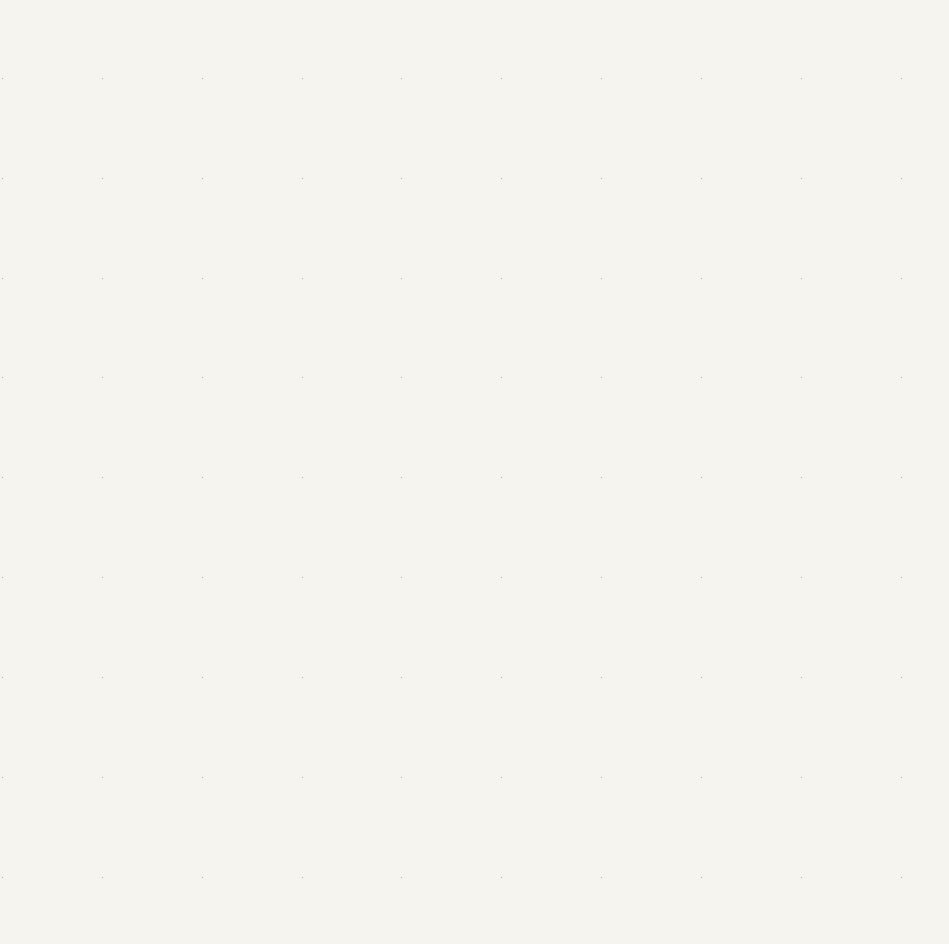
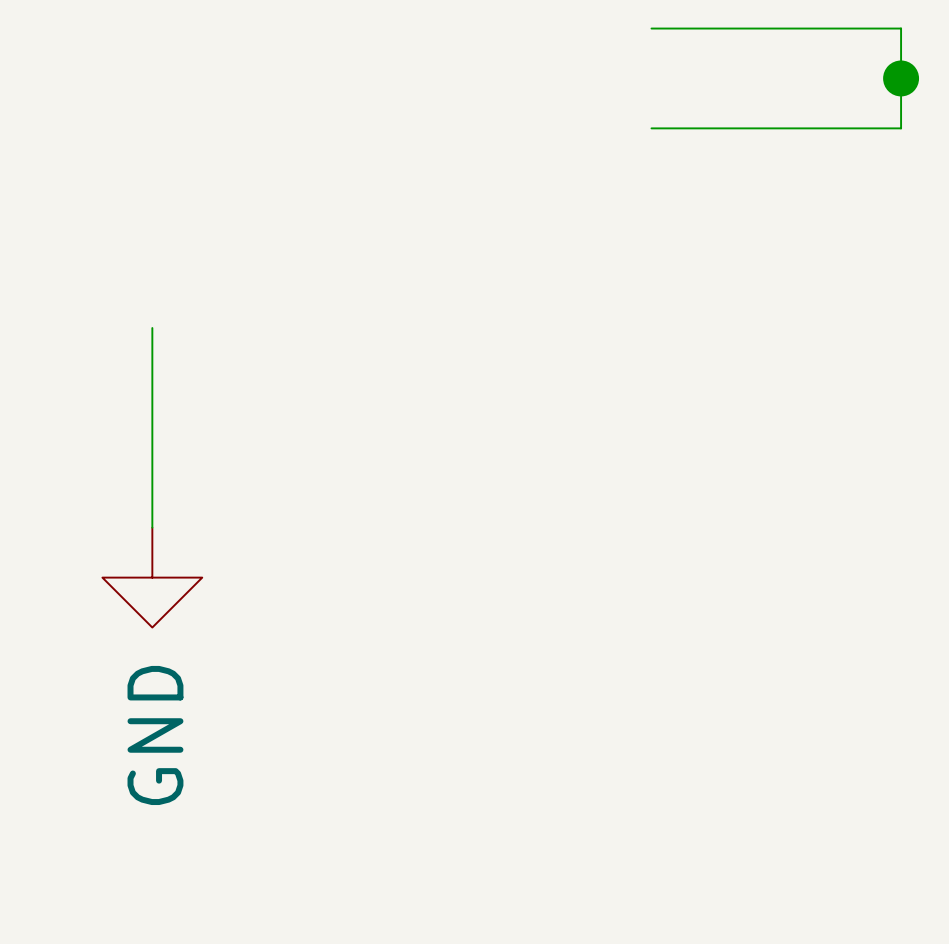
wire: none -> (651, 28) (901, 28) (901, 128) (651, 128)
junction: none -> (901, 78)
wire: none -> (152, 328) (152, 527)
power symbol: none -> GND (152, 577)

